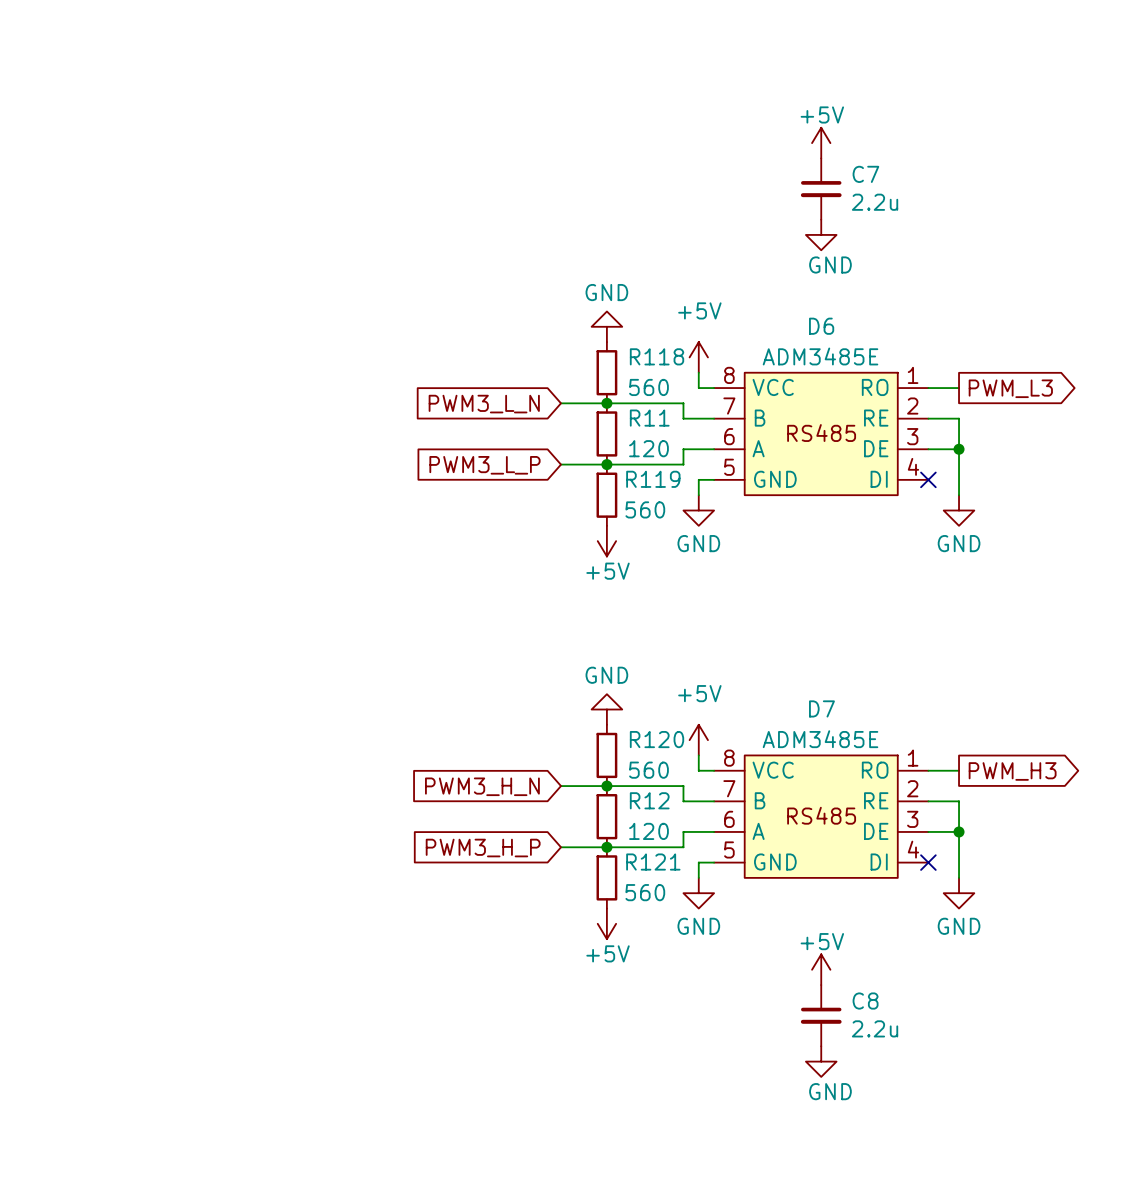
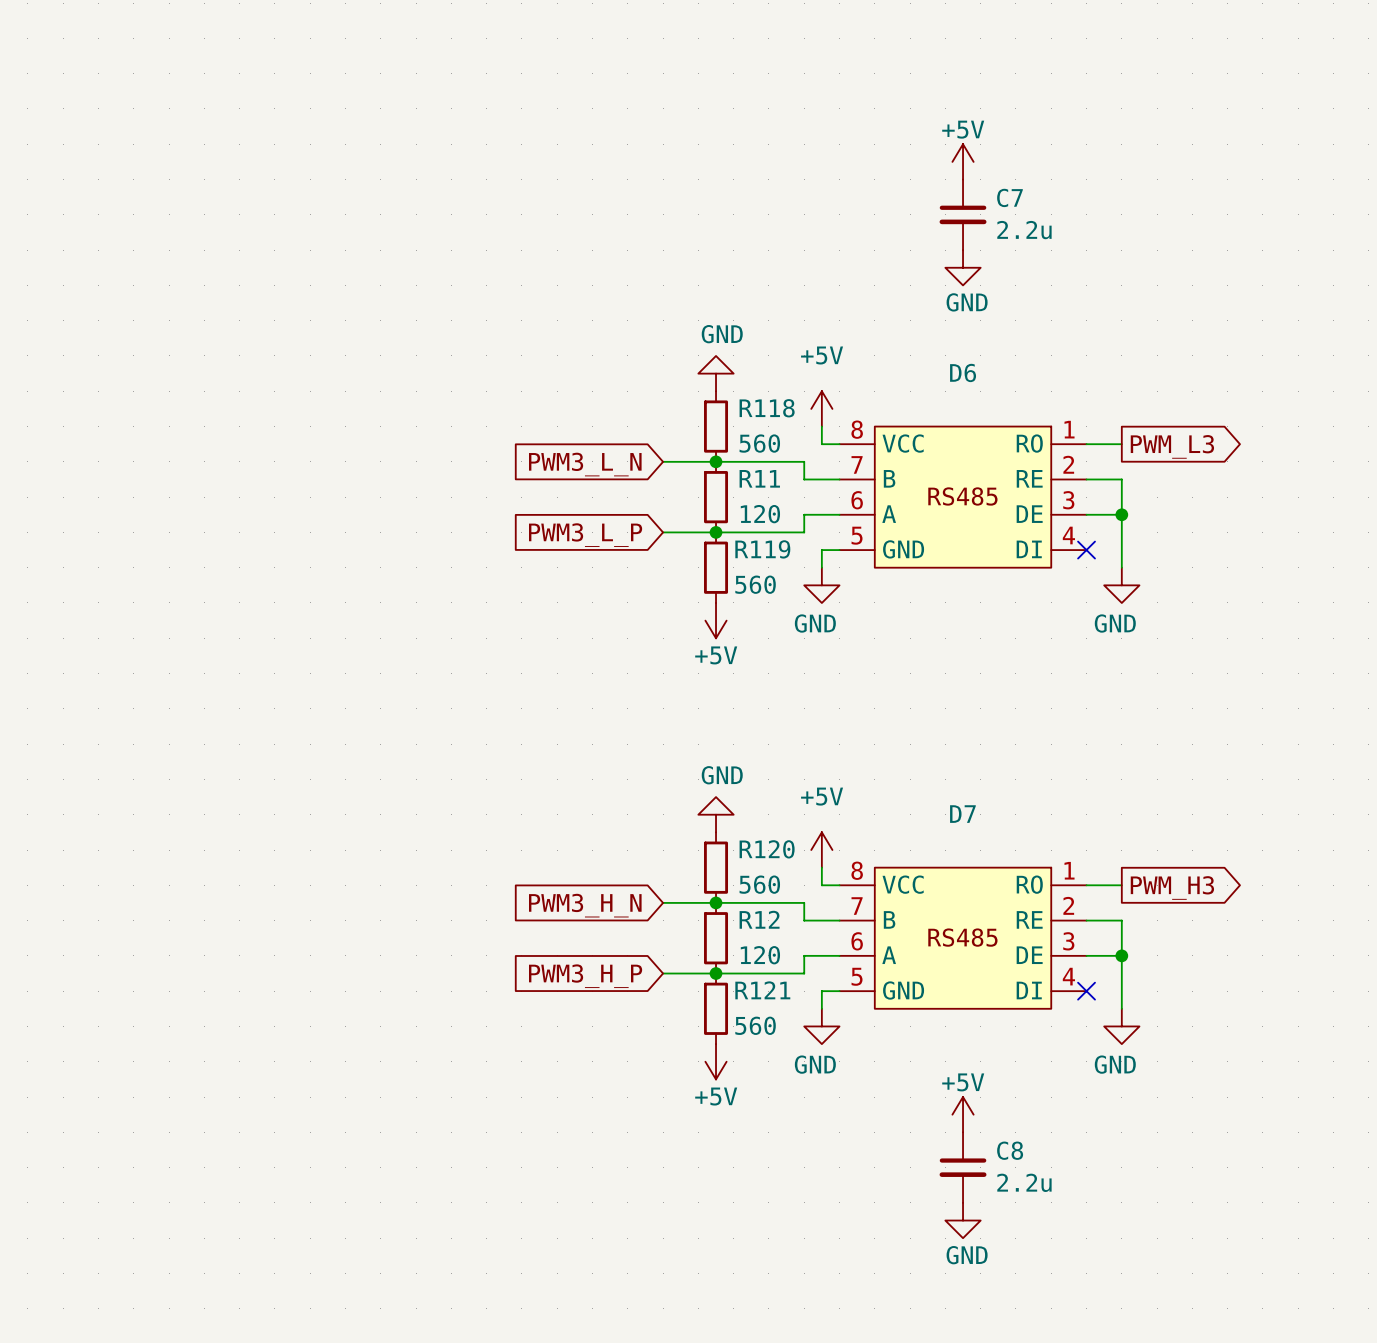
D6 value: ADM3485E (820, 356) -> none
D7 value: ADM3485E (820, 739) -> none

